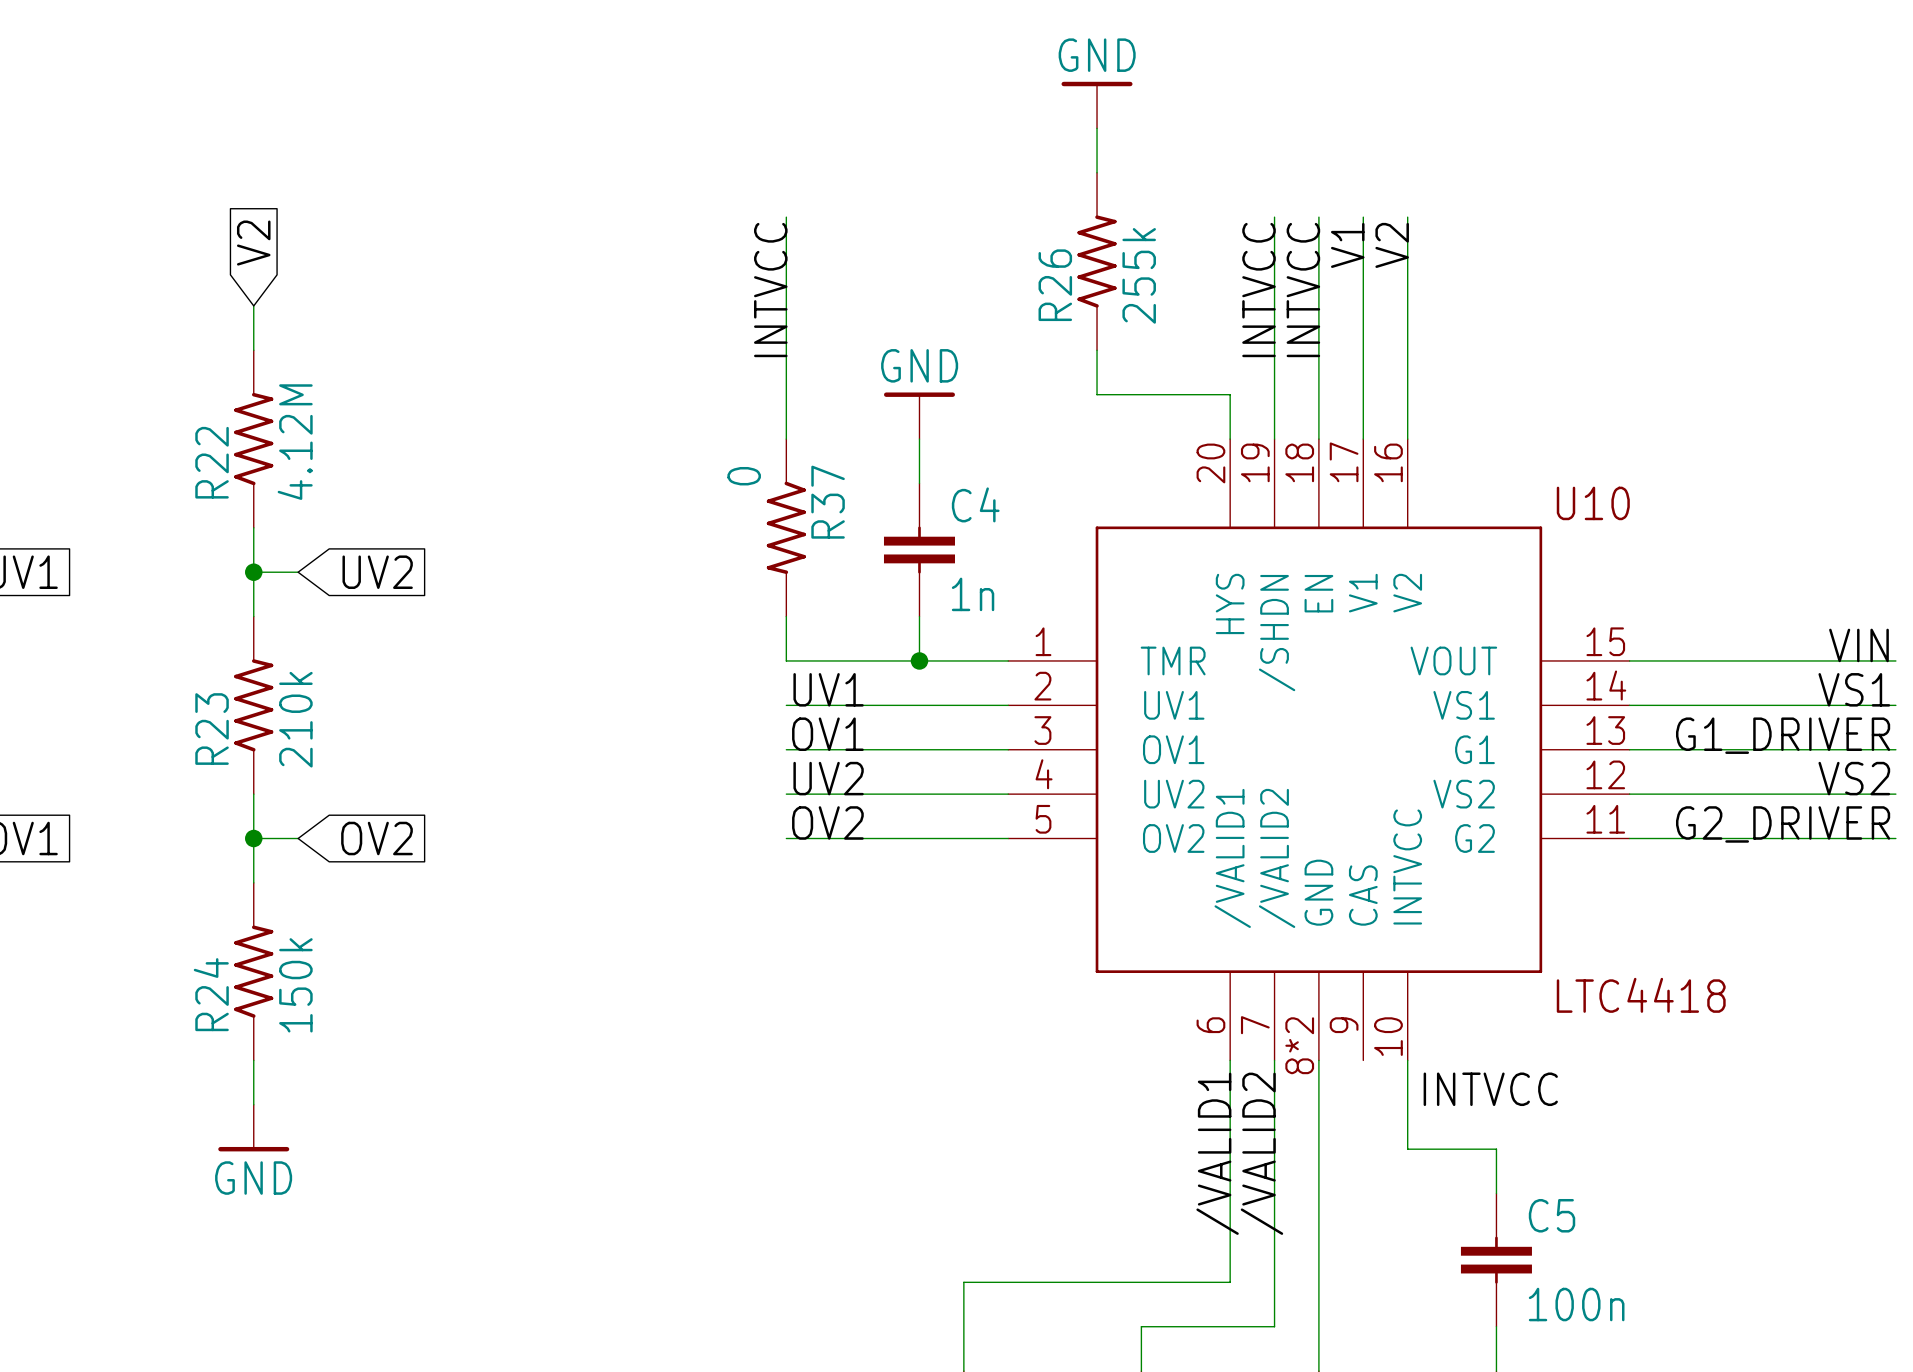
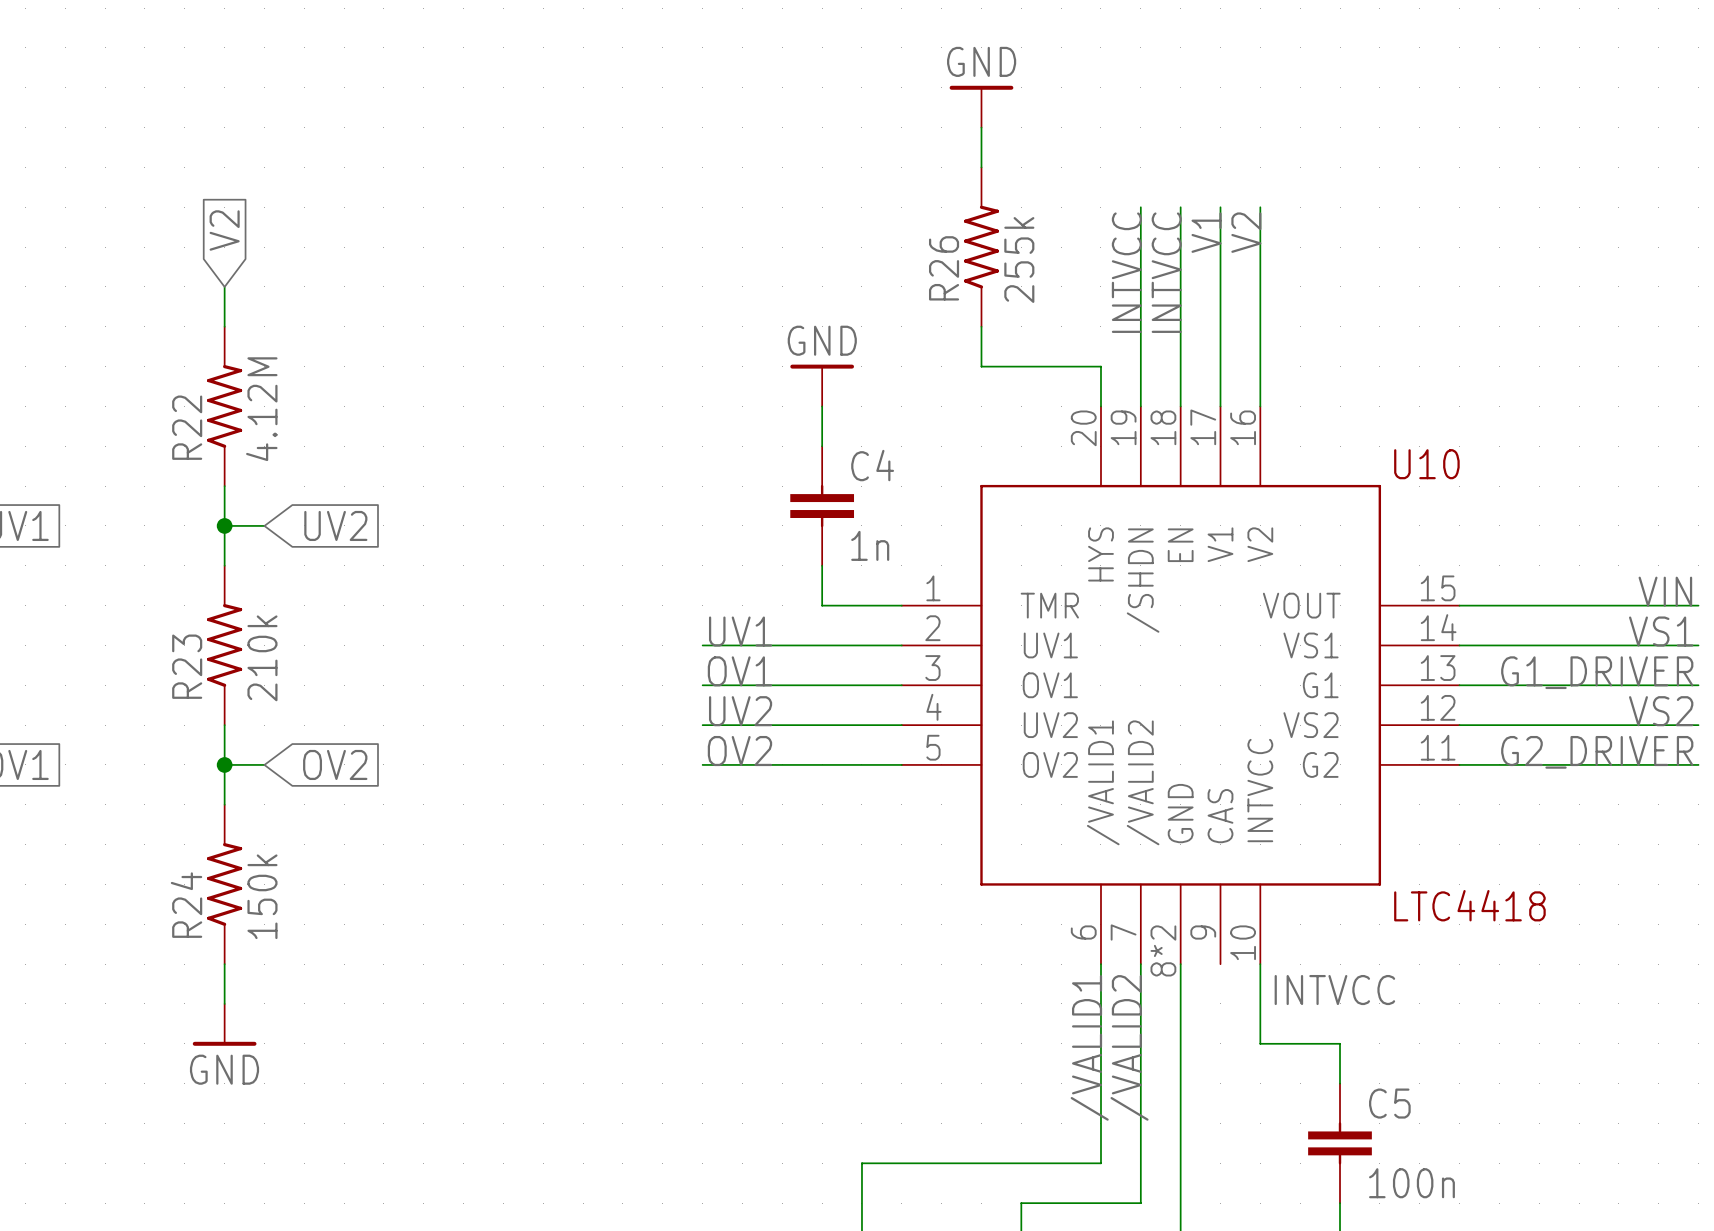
wire: (786, 217) (786, 439) -> none
label: INTVCC (770, 290) -> none
R37: 0 (786, 527) -> none
wire: (786, 616) (786, 660) (919, 660) -> none
junction: (919, 660) -> none

